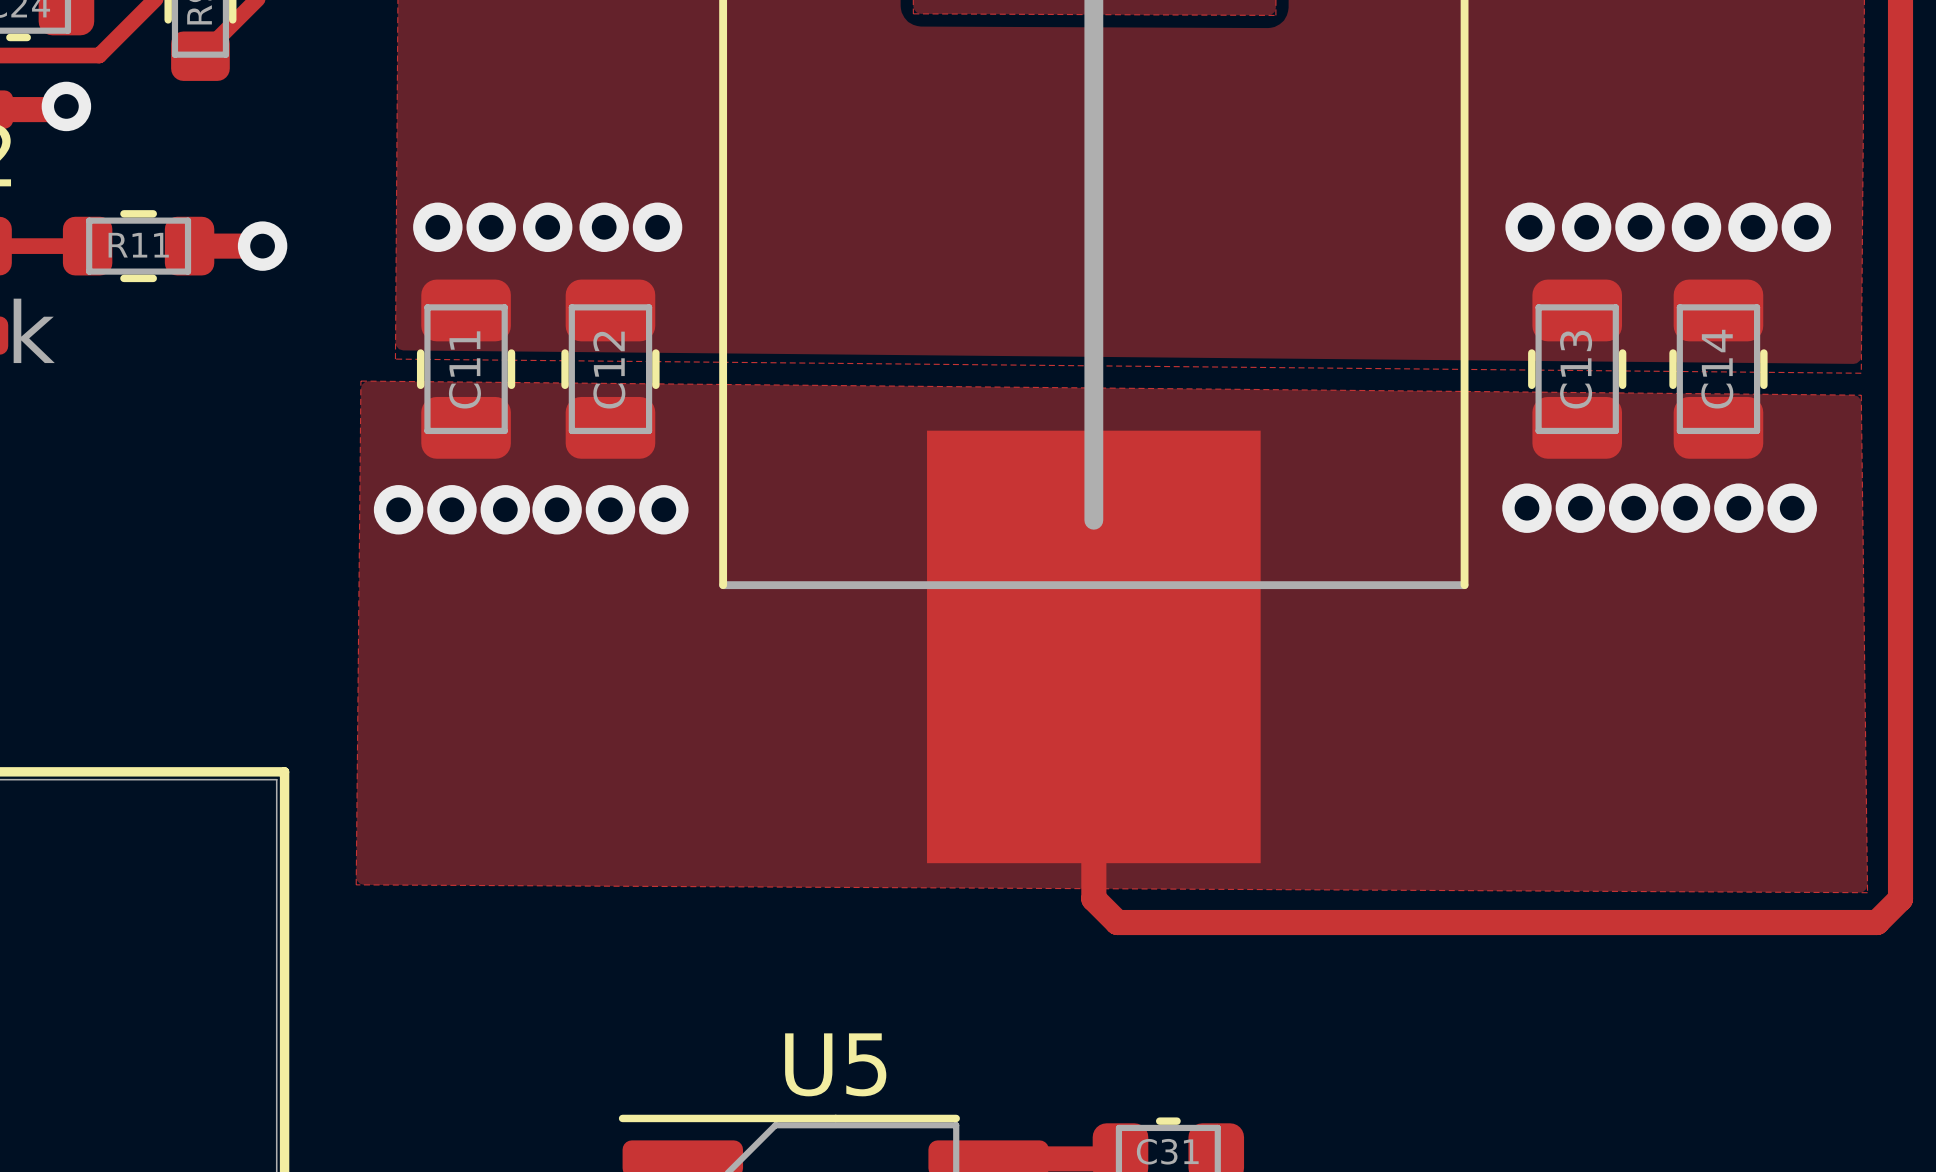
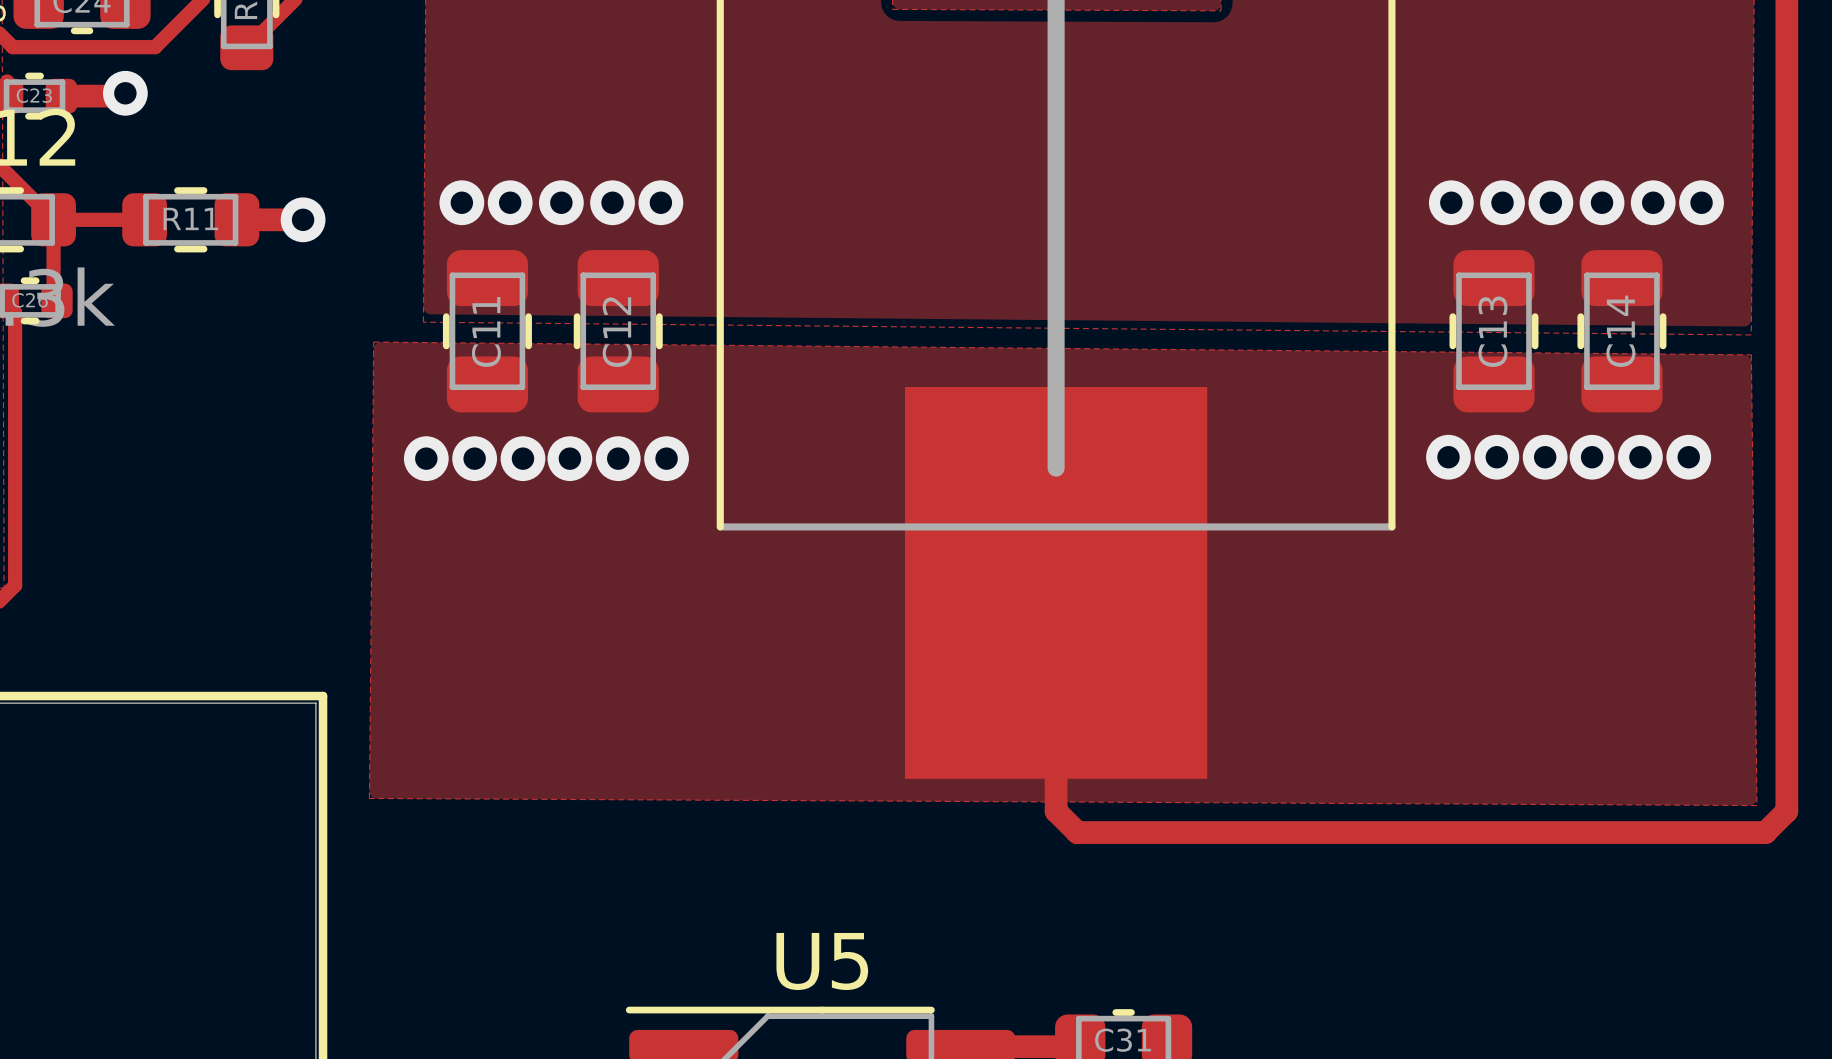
zone outline: (1861, 395) (360, 381) (356, 884) (1867, 892) -> (1751, 354) (373, 342) (369, 798) (1756, 805)

